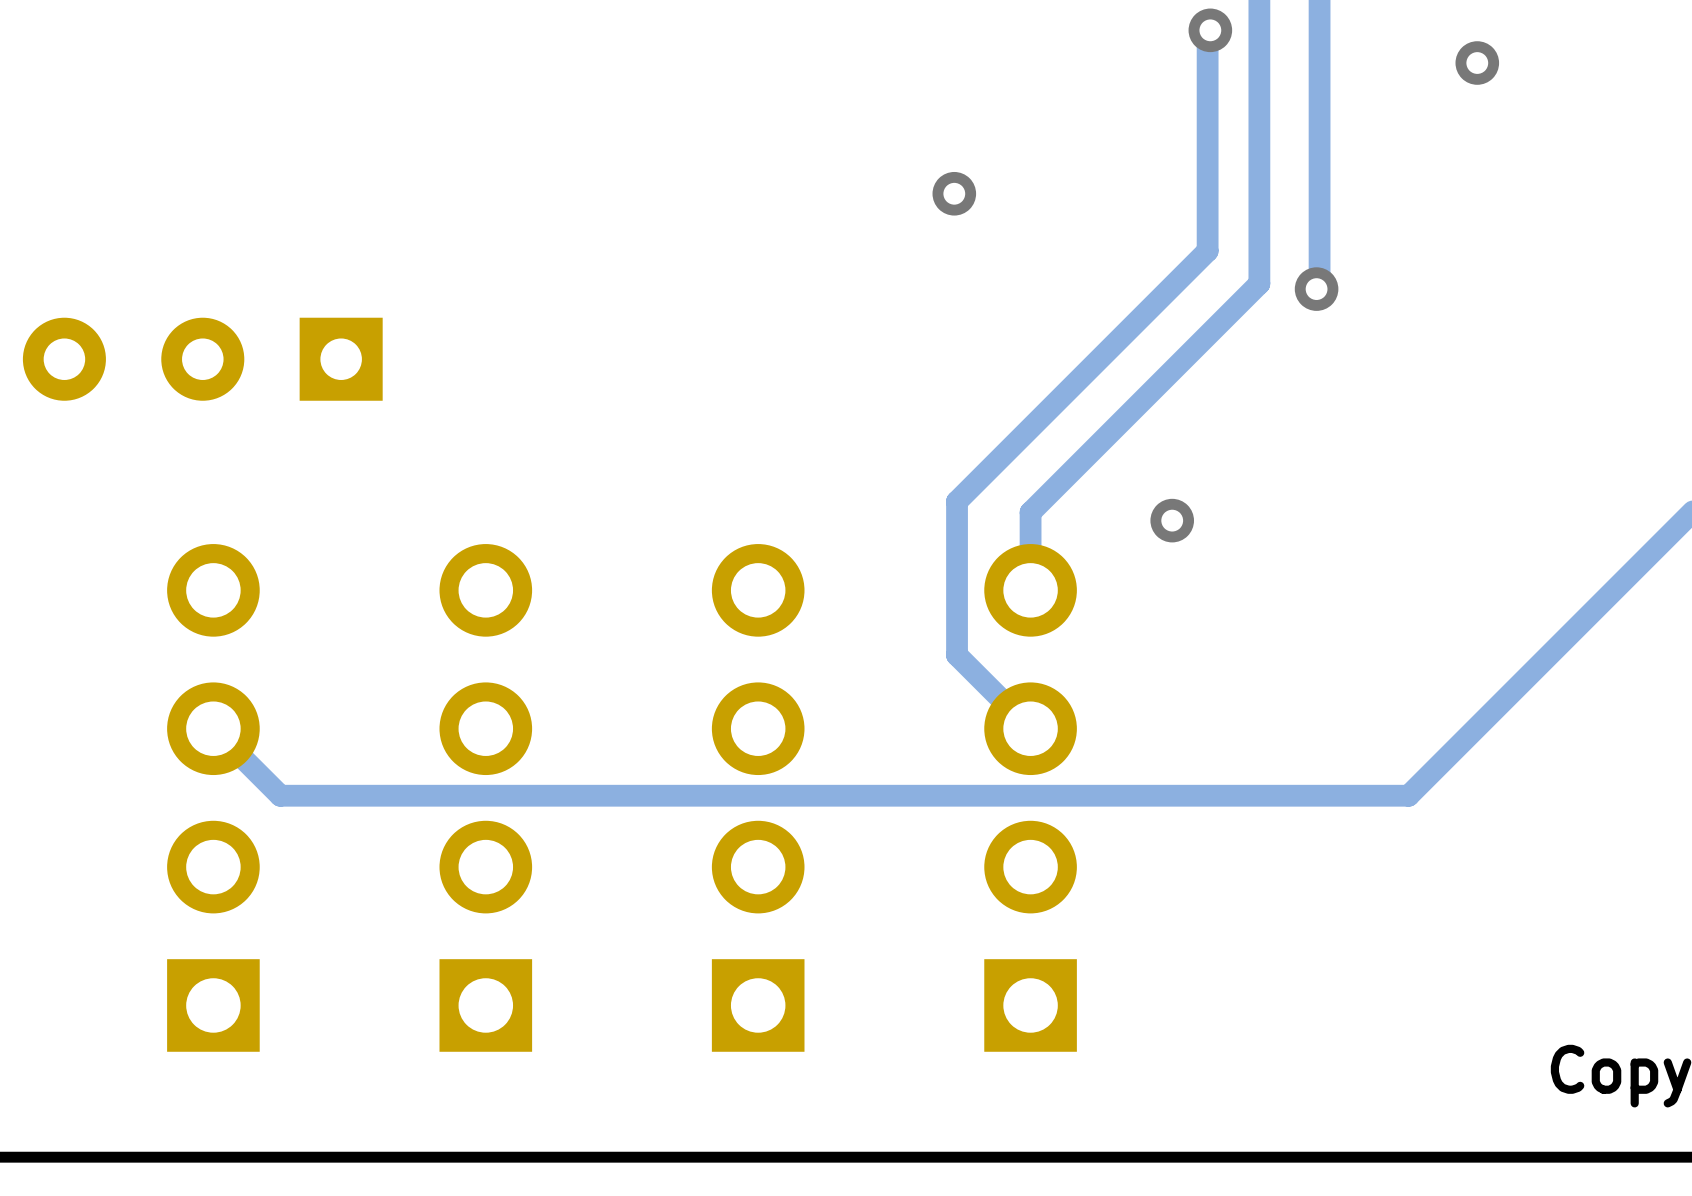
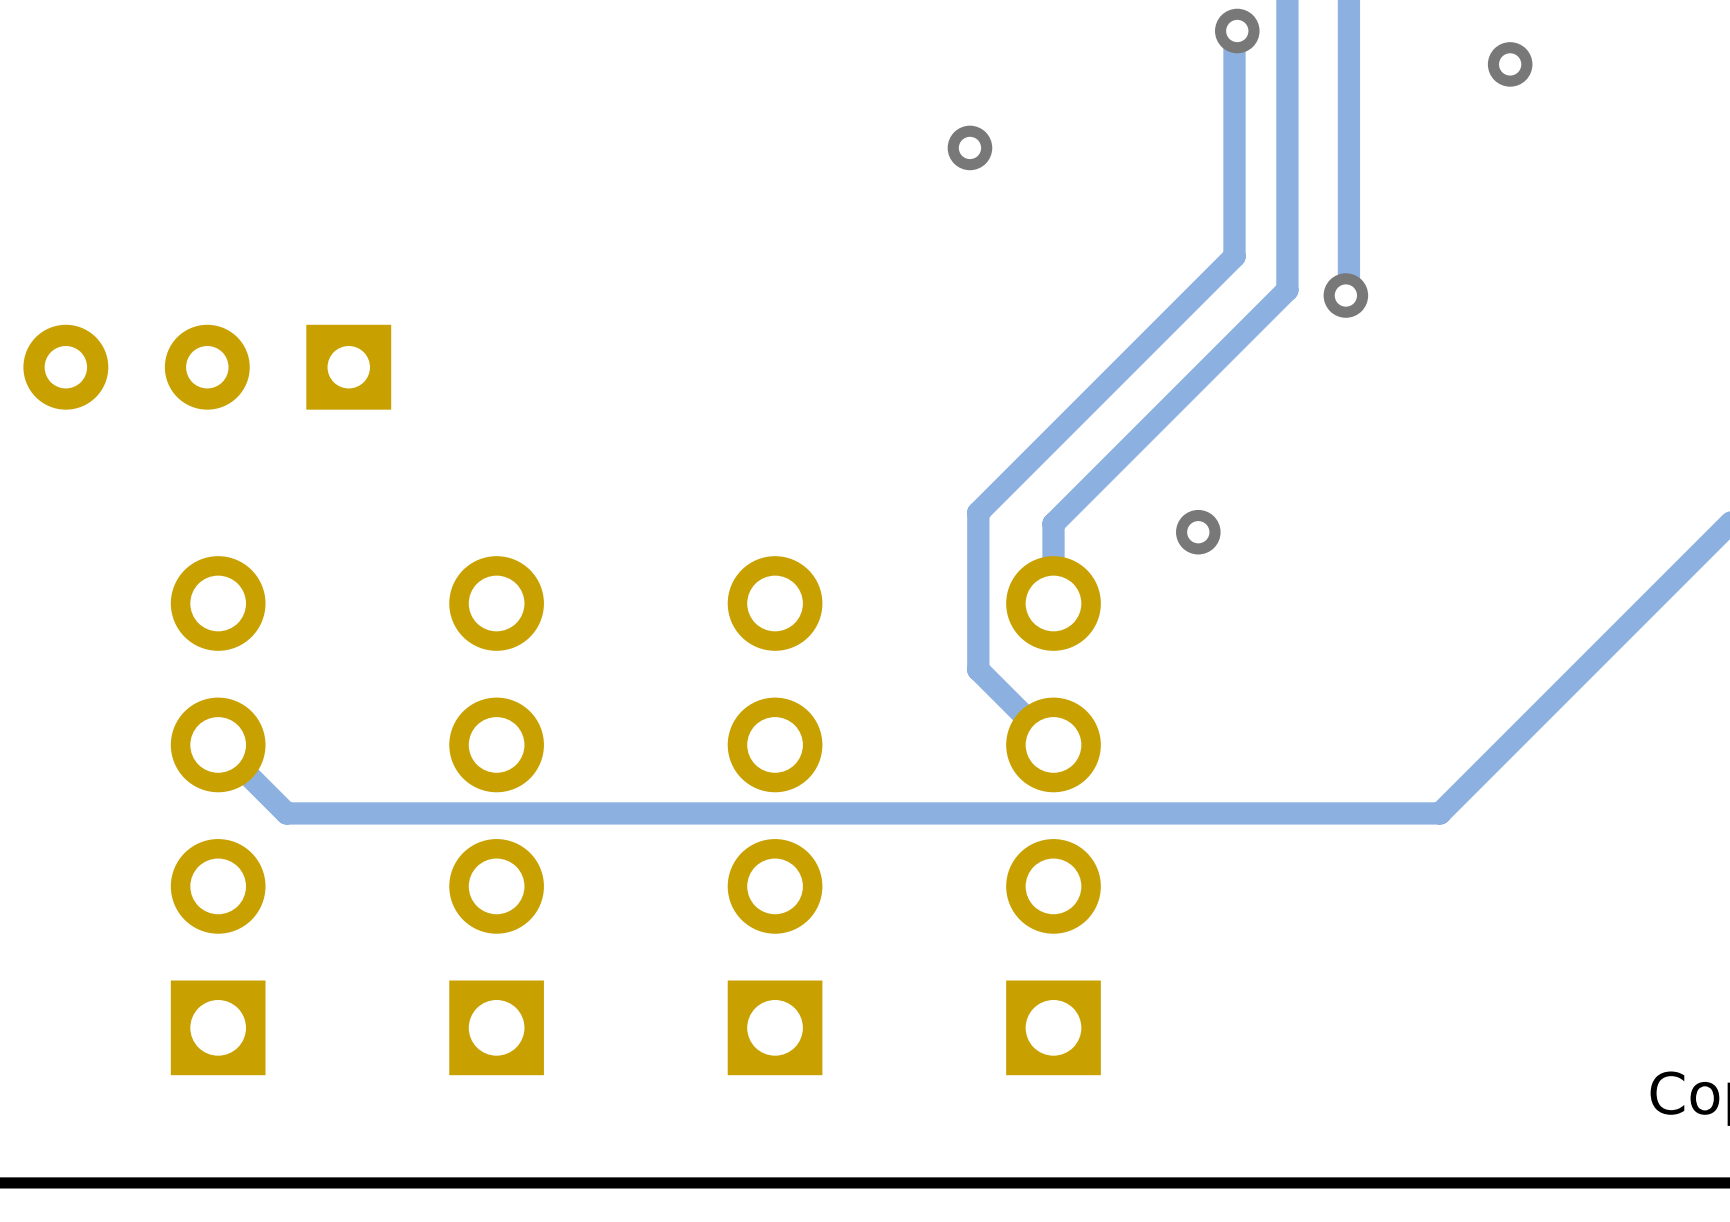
via position: (954, 193) -> (969, 147)

